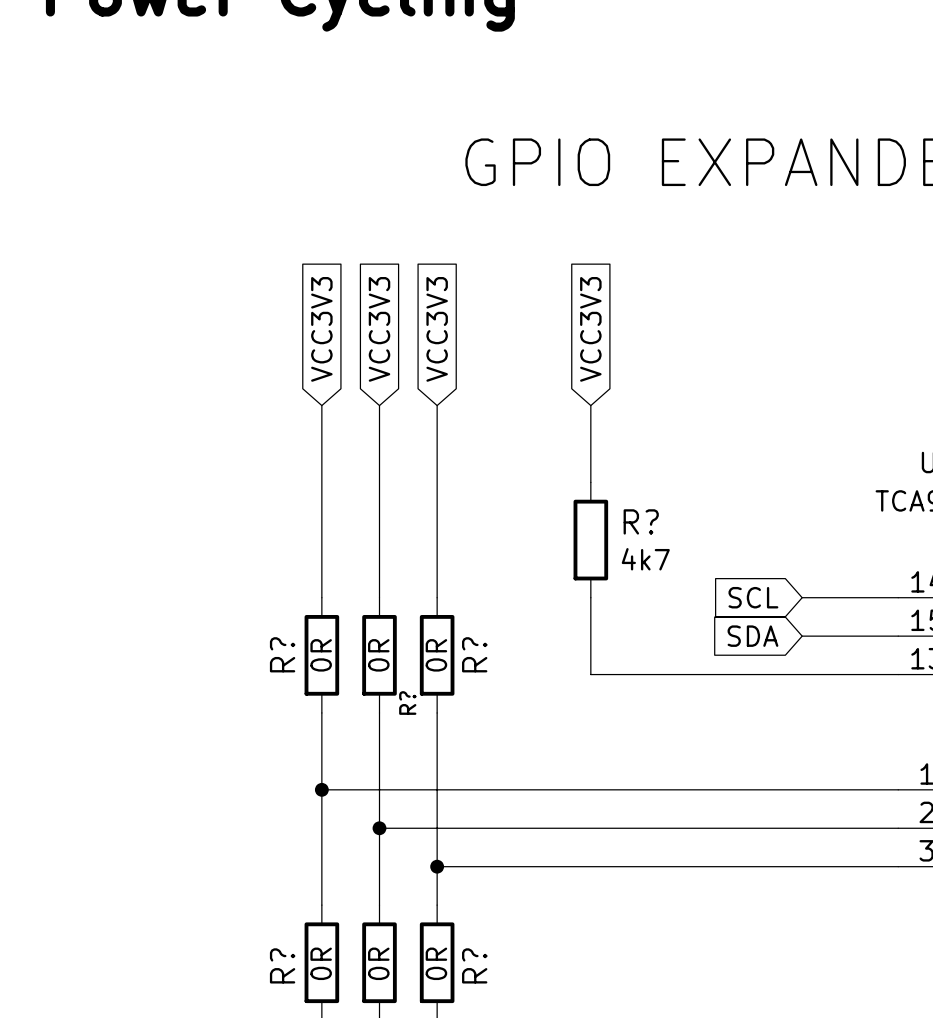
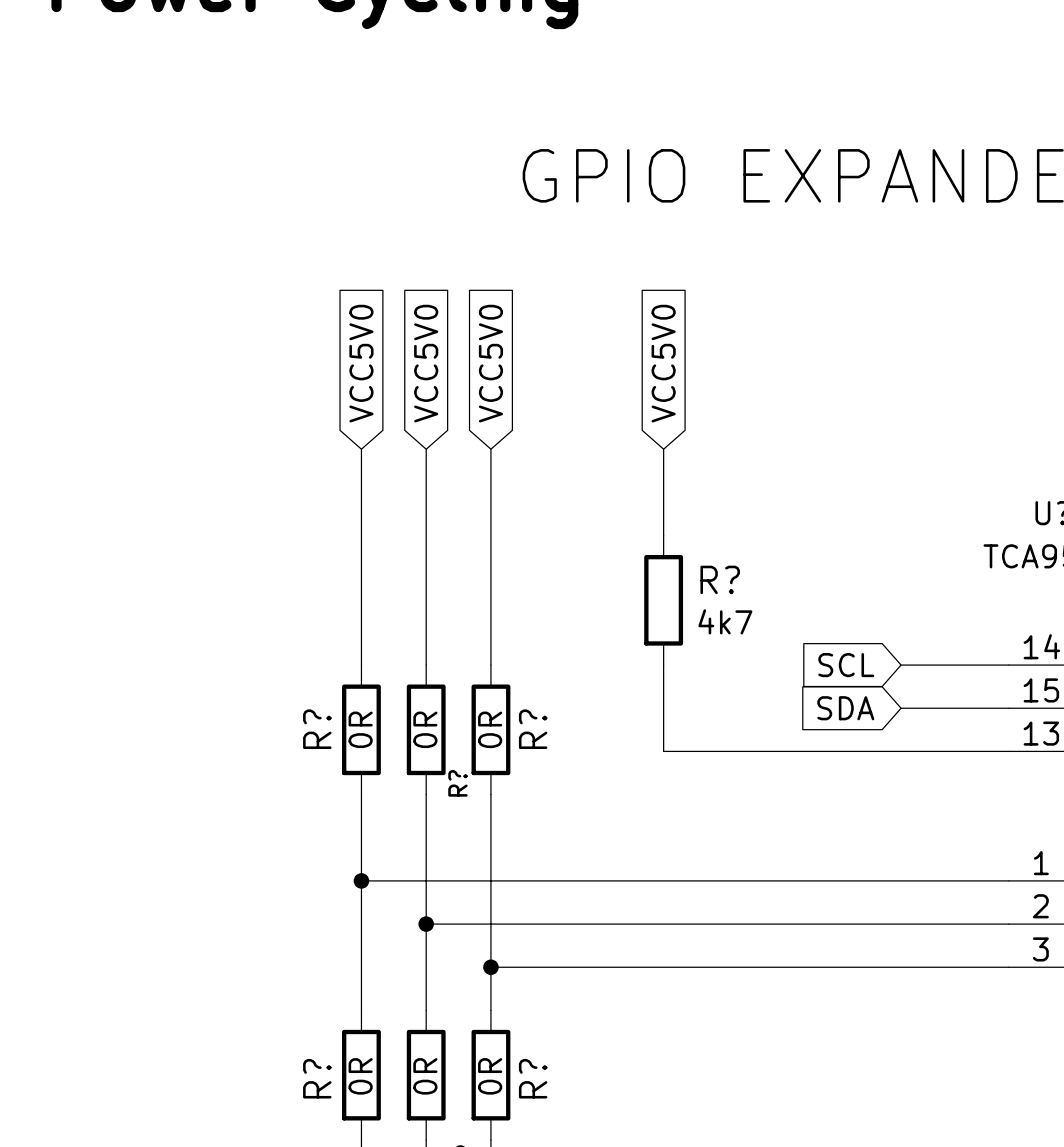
global label: VCC3V3 (321, 329) -> VCC5V0 (361, 363)
global label: VCC3V3 (379, 329) -> VCC5V0 (426, 363)
global label: VCC3V3 (437, 329) -> VCC5V0 (490, 363)
global label: VCC3V3 (590, 329) -> VCC5V0 (663, 363)

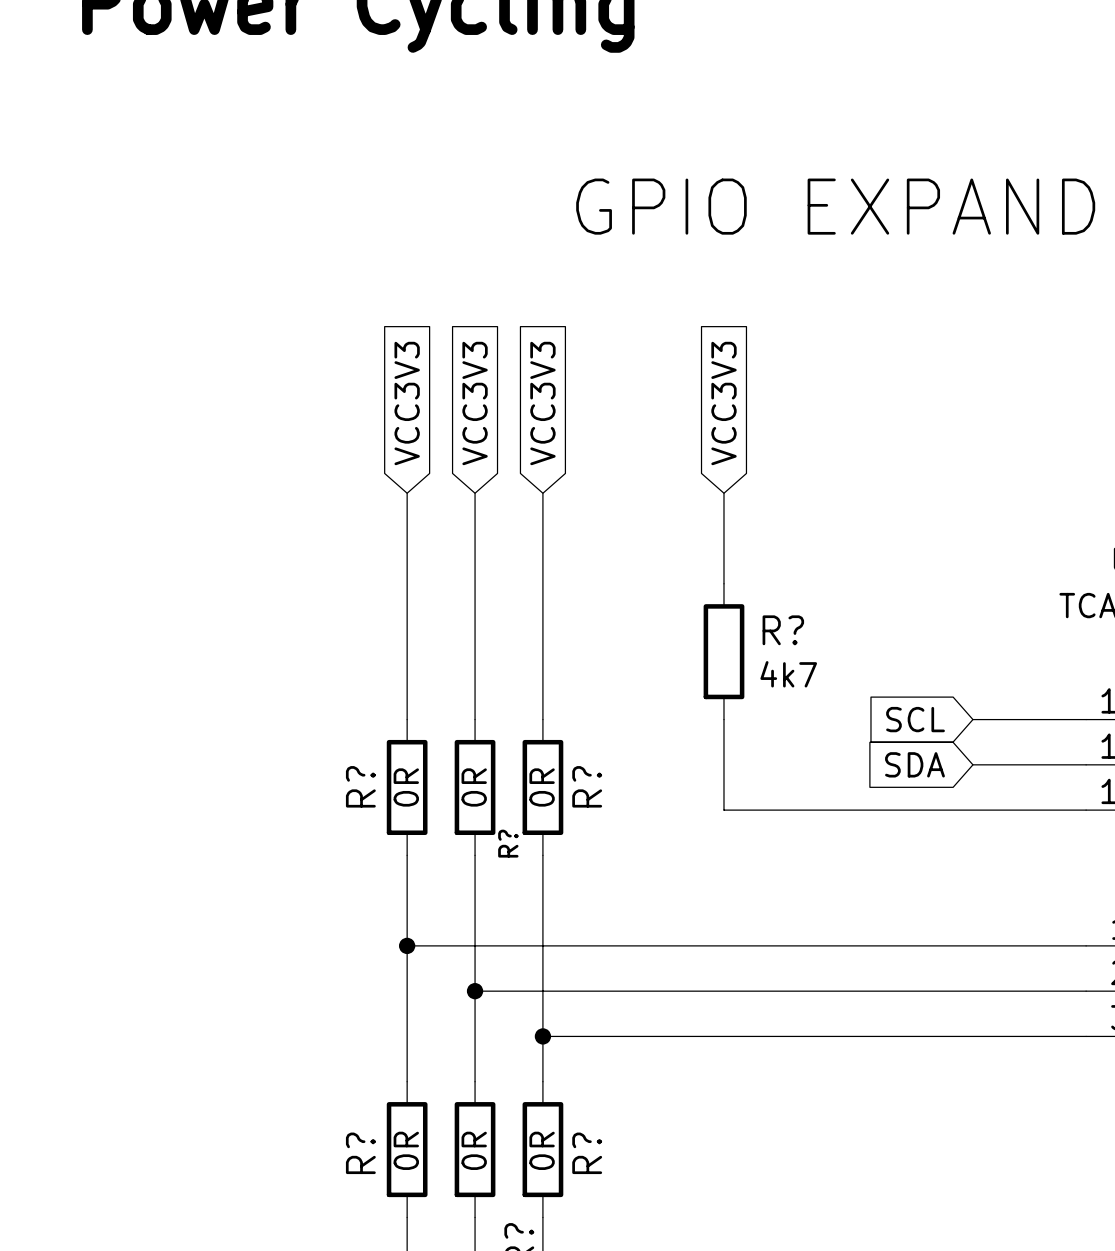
global label: VCC5V0 (361, 363) -> VCC3V3 (407, 403)
global label: VCC5V0 (426, 363) -> VCC3V3 (475, 403)
global label: VCC5V0 (490, 363) -> VCC3V3 (542, 403)
global label: VCC5V0 (663, 363) -> VCC3V3 (723, 403)

